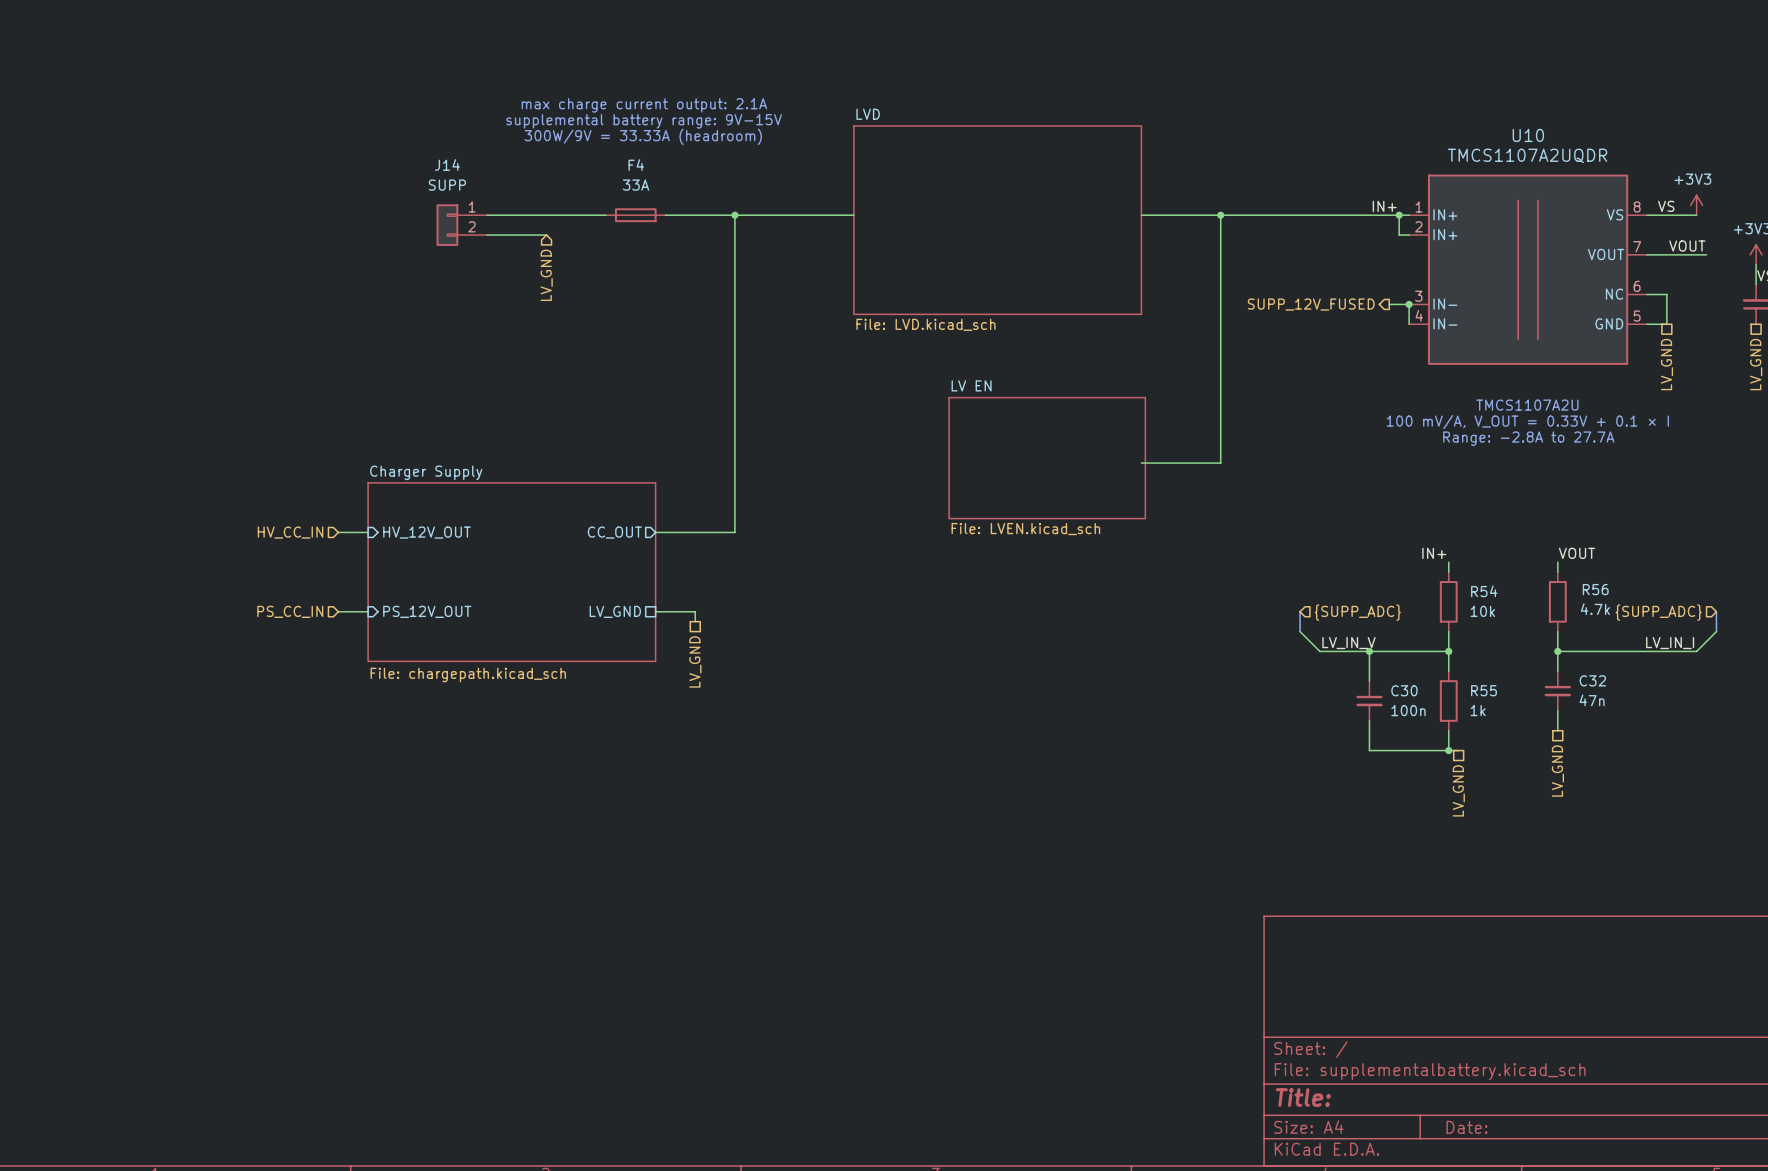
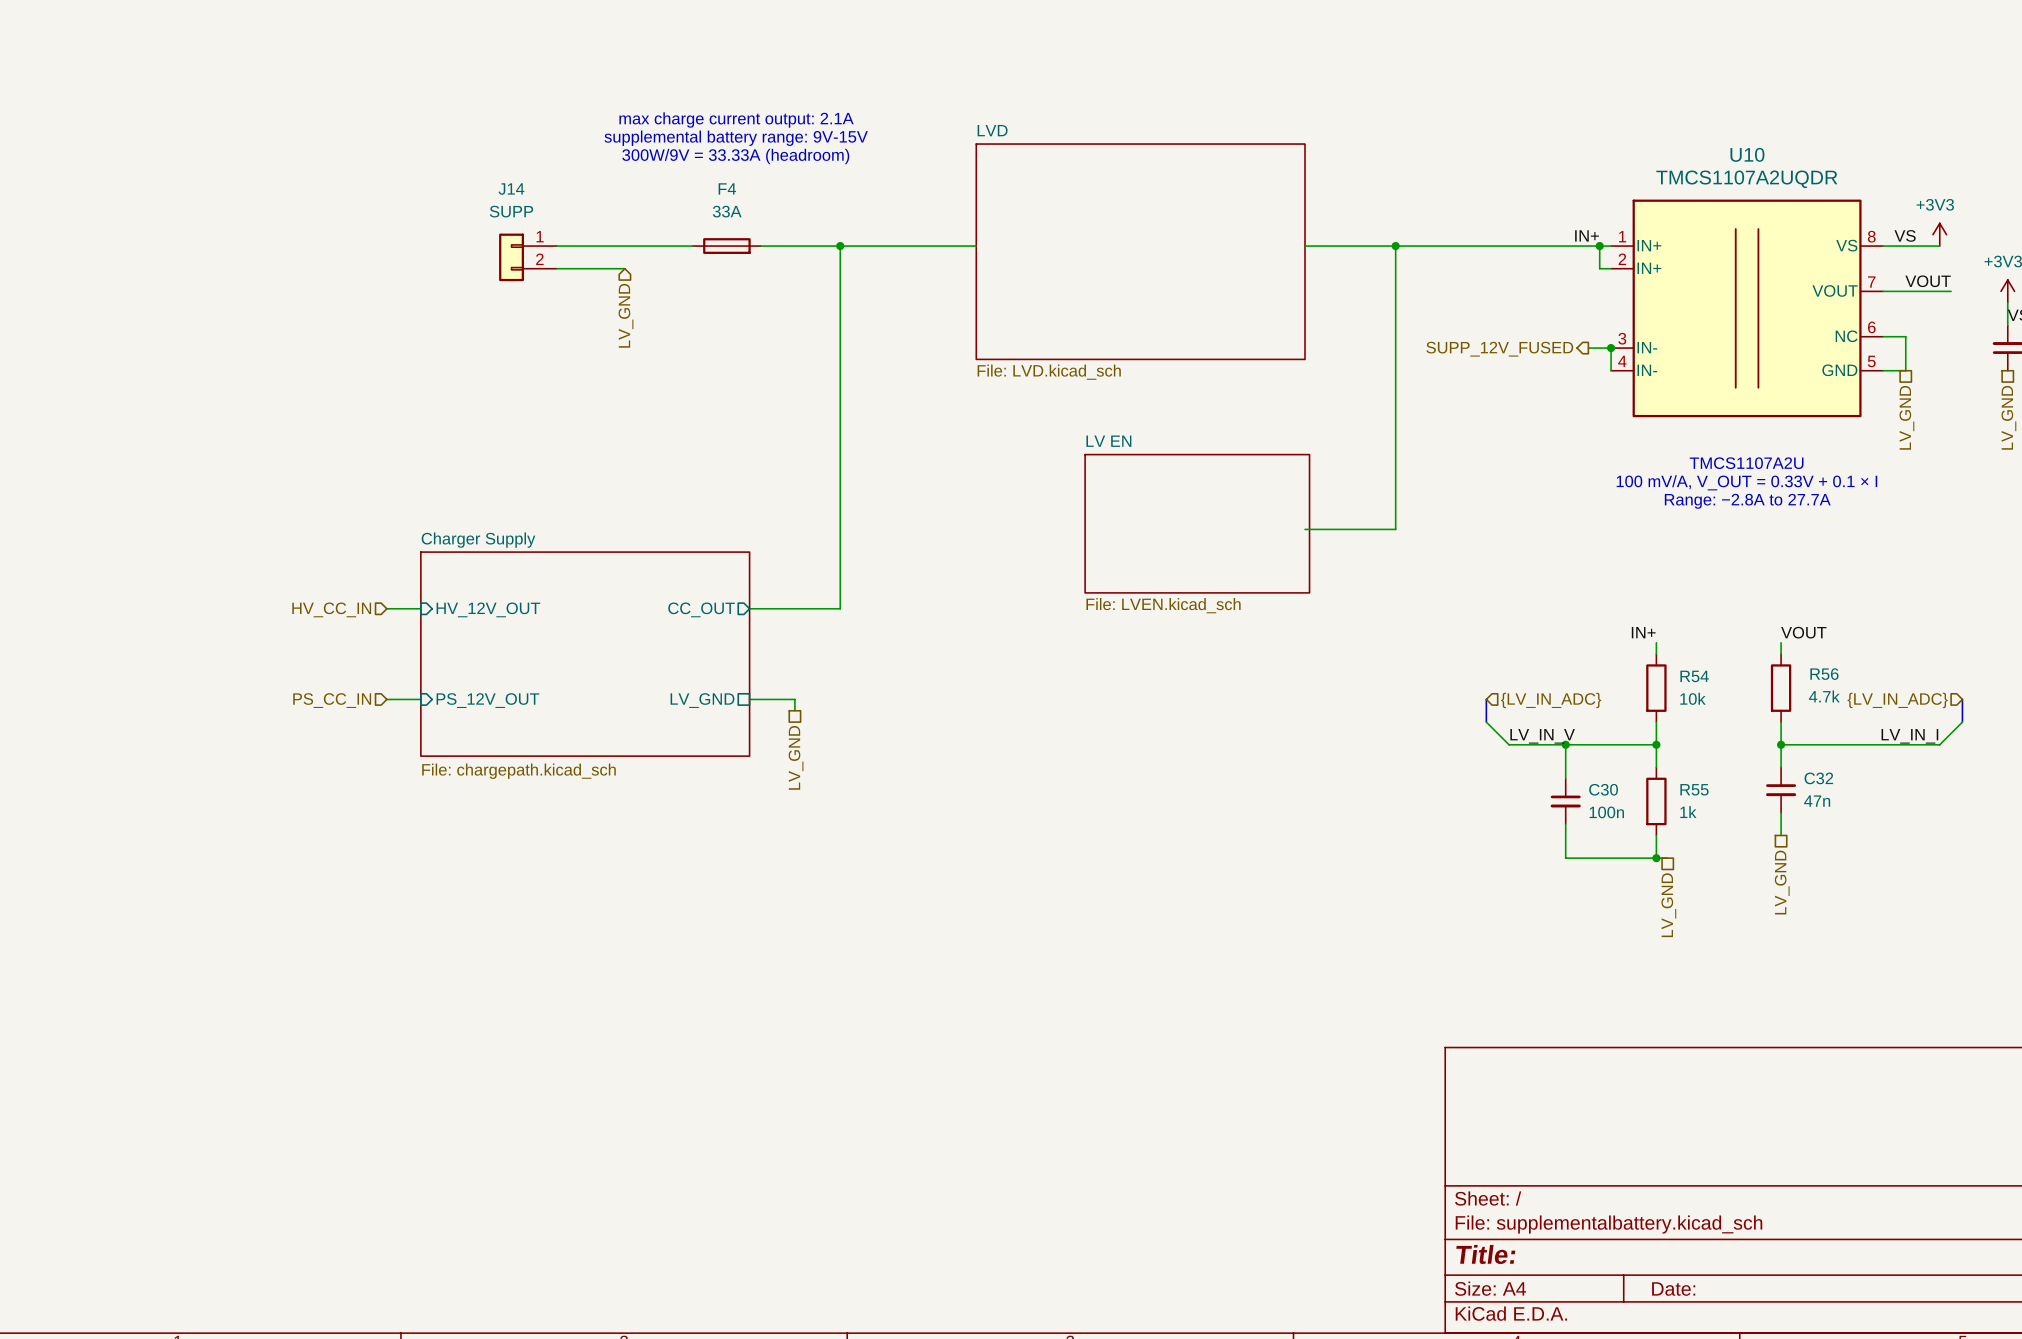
hierarchical label: {SUPP_ADC} (1357, 612) -> {LV_IN_ADC} (1551, 700)
hierarchical label: {SUPP_ADC} (1658, 612) -> {LV_IN_ADC} (1897, 700)

